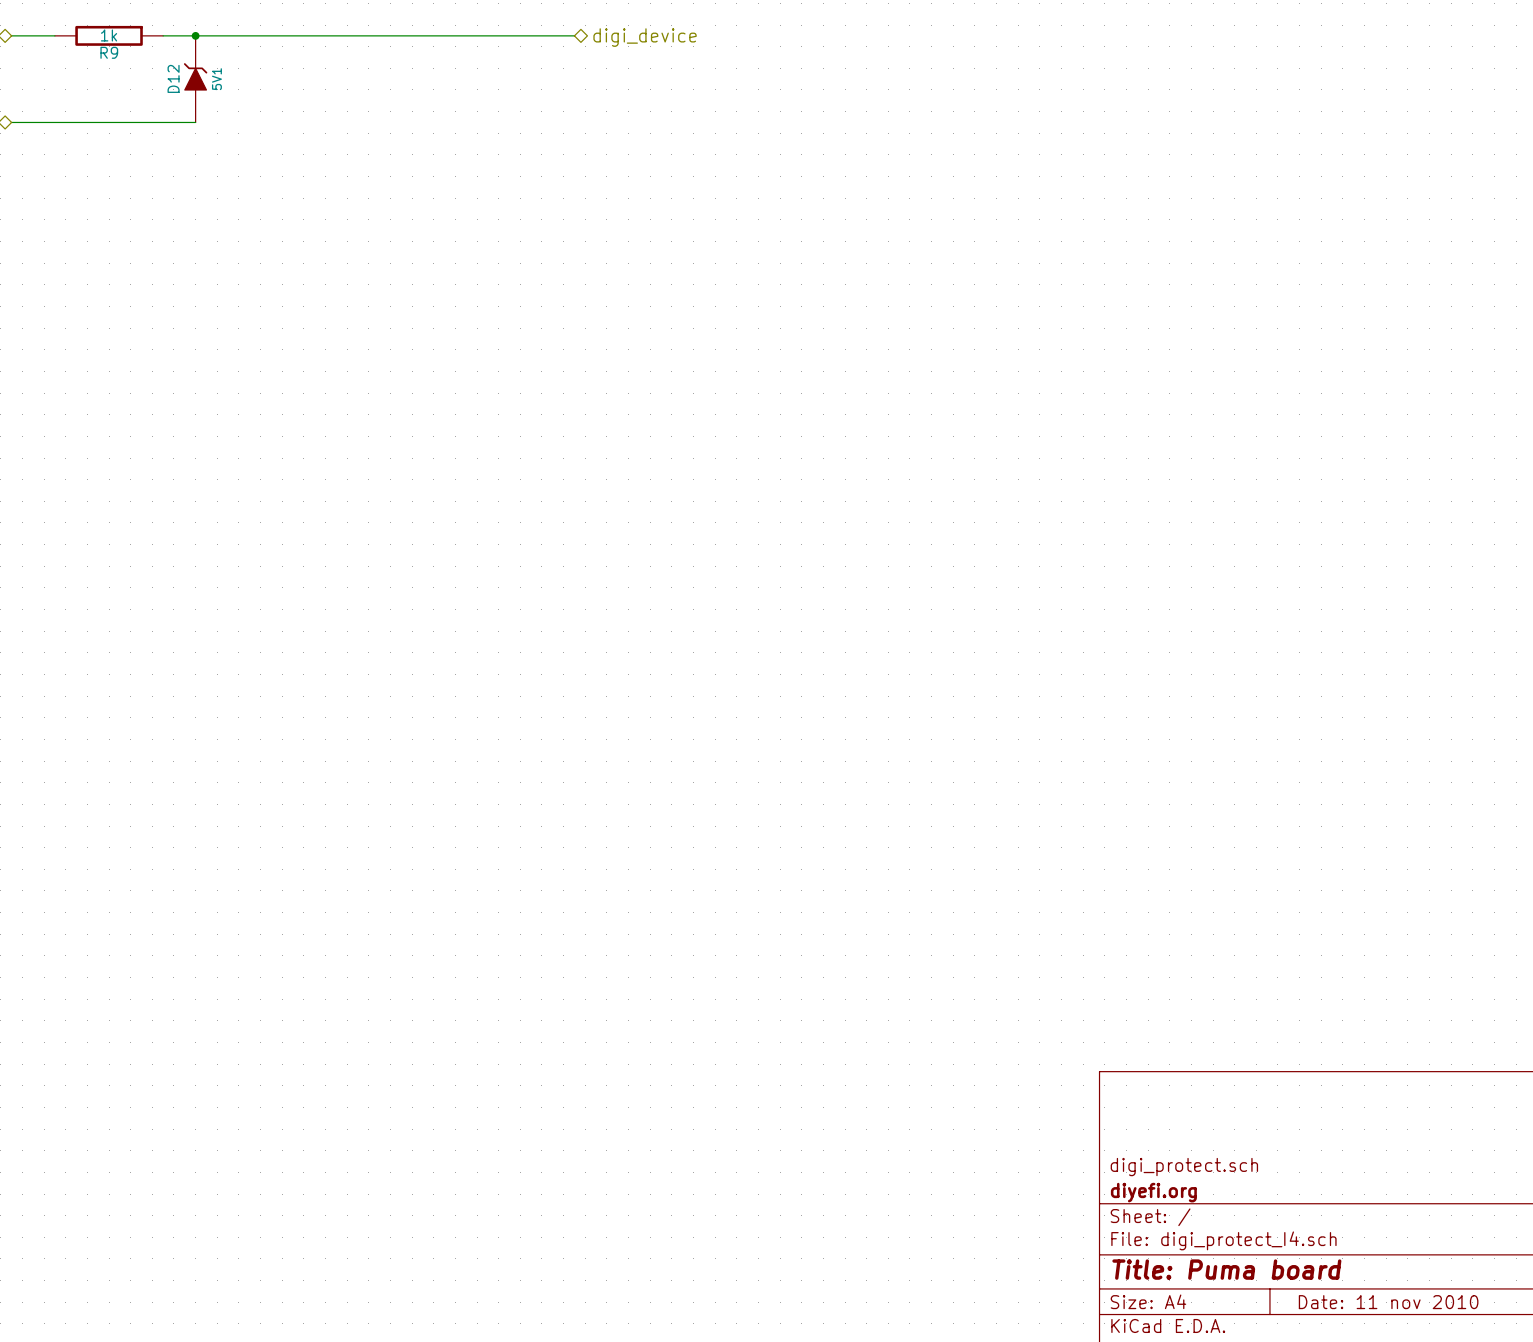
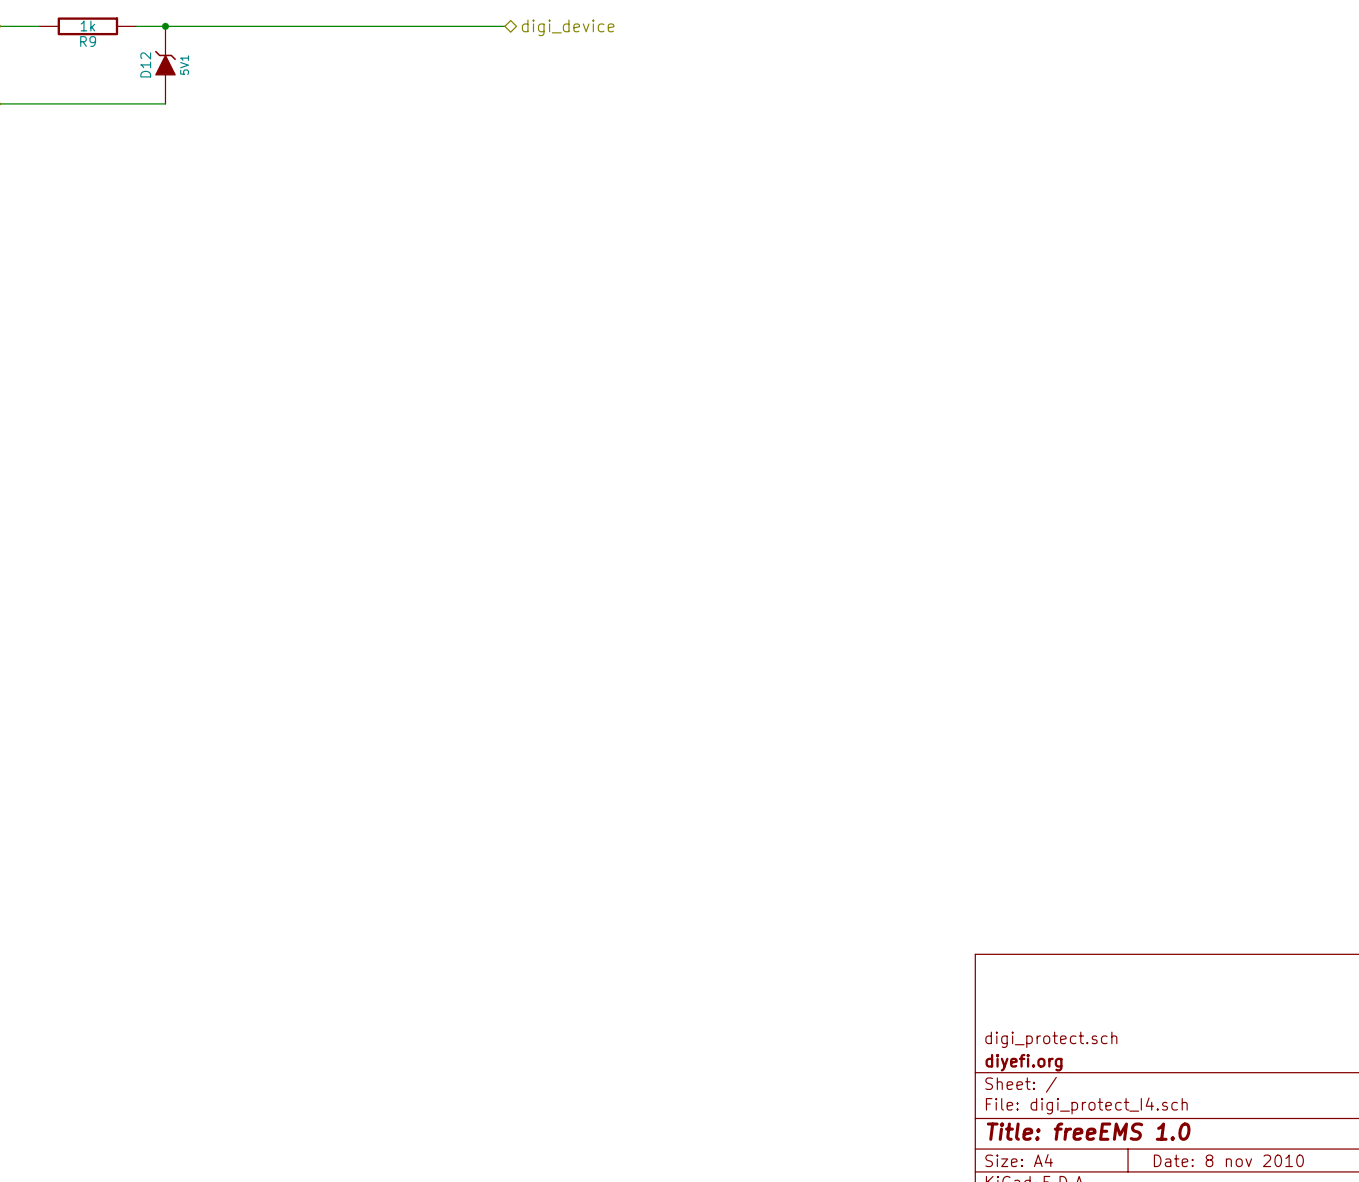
title block: Title: Puma board (1226, 1269) -> Title: freeEMS 1.0 (1088, 1131)
title block: Date: 11 nov 2010 (1388, 1302) -> Date: 8 nov 2010 (1228, 1160)

